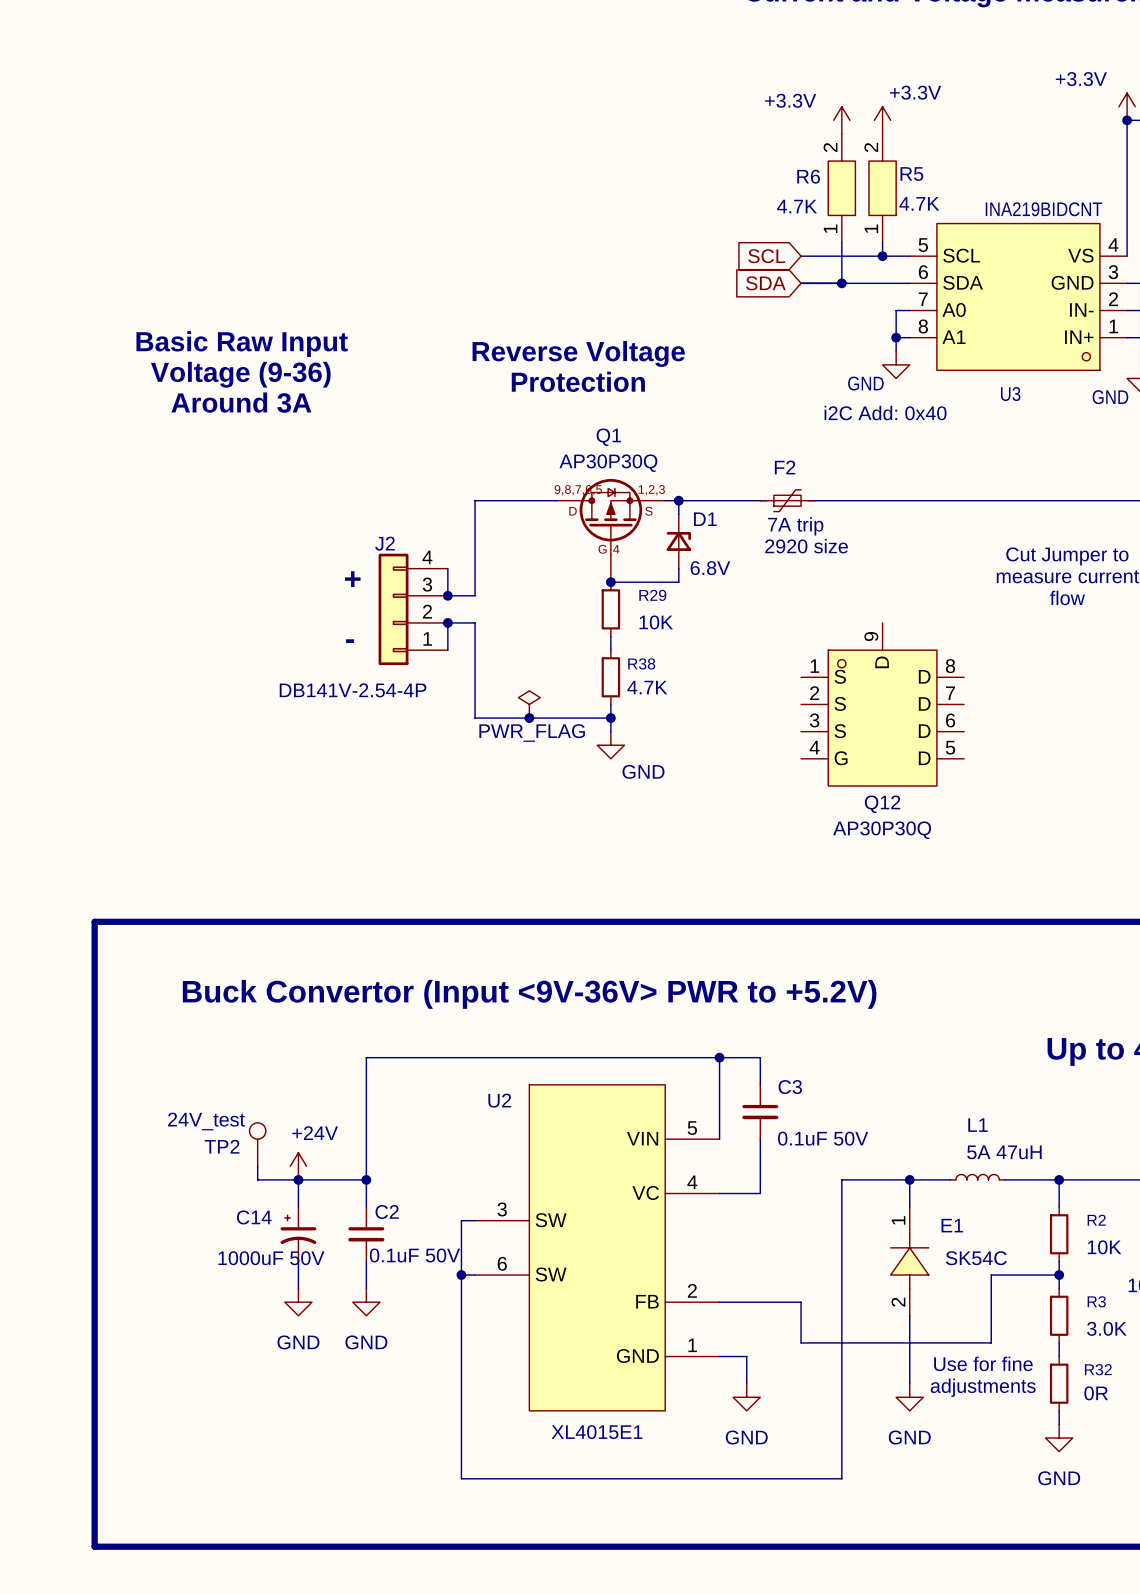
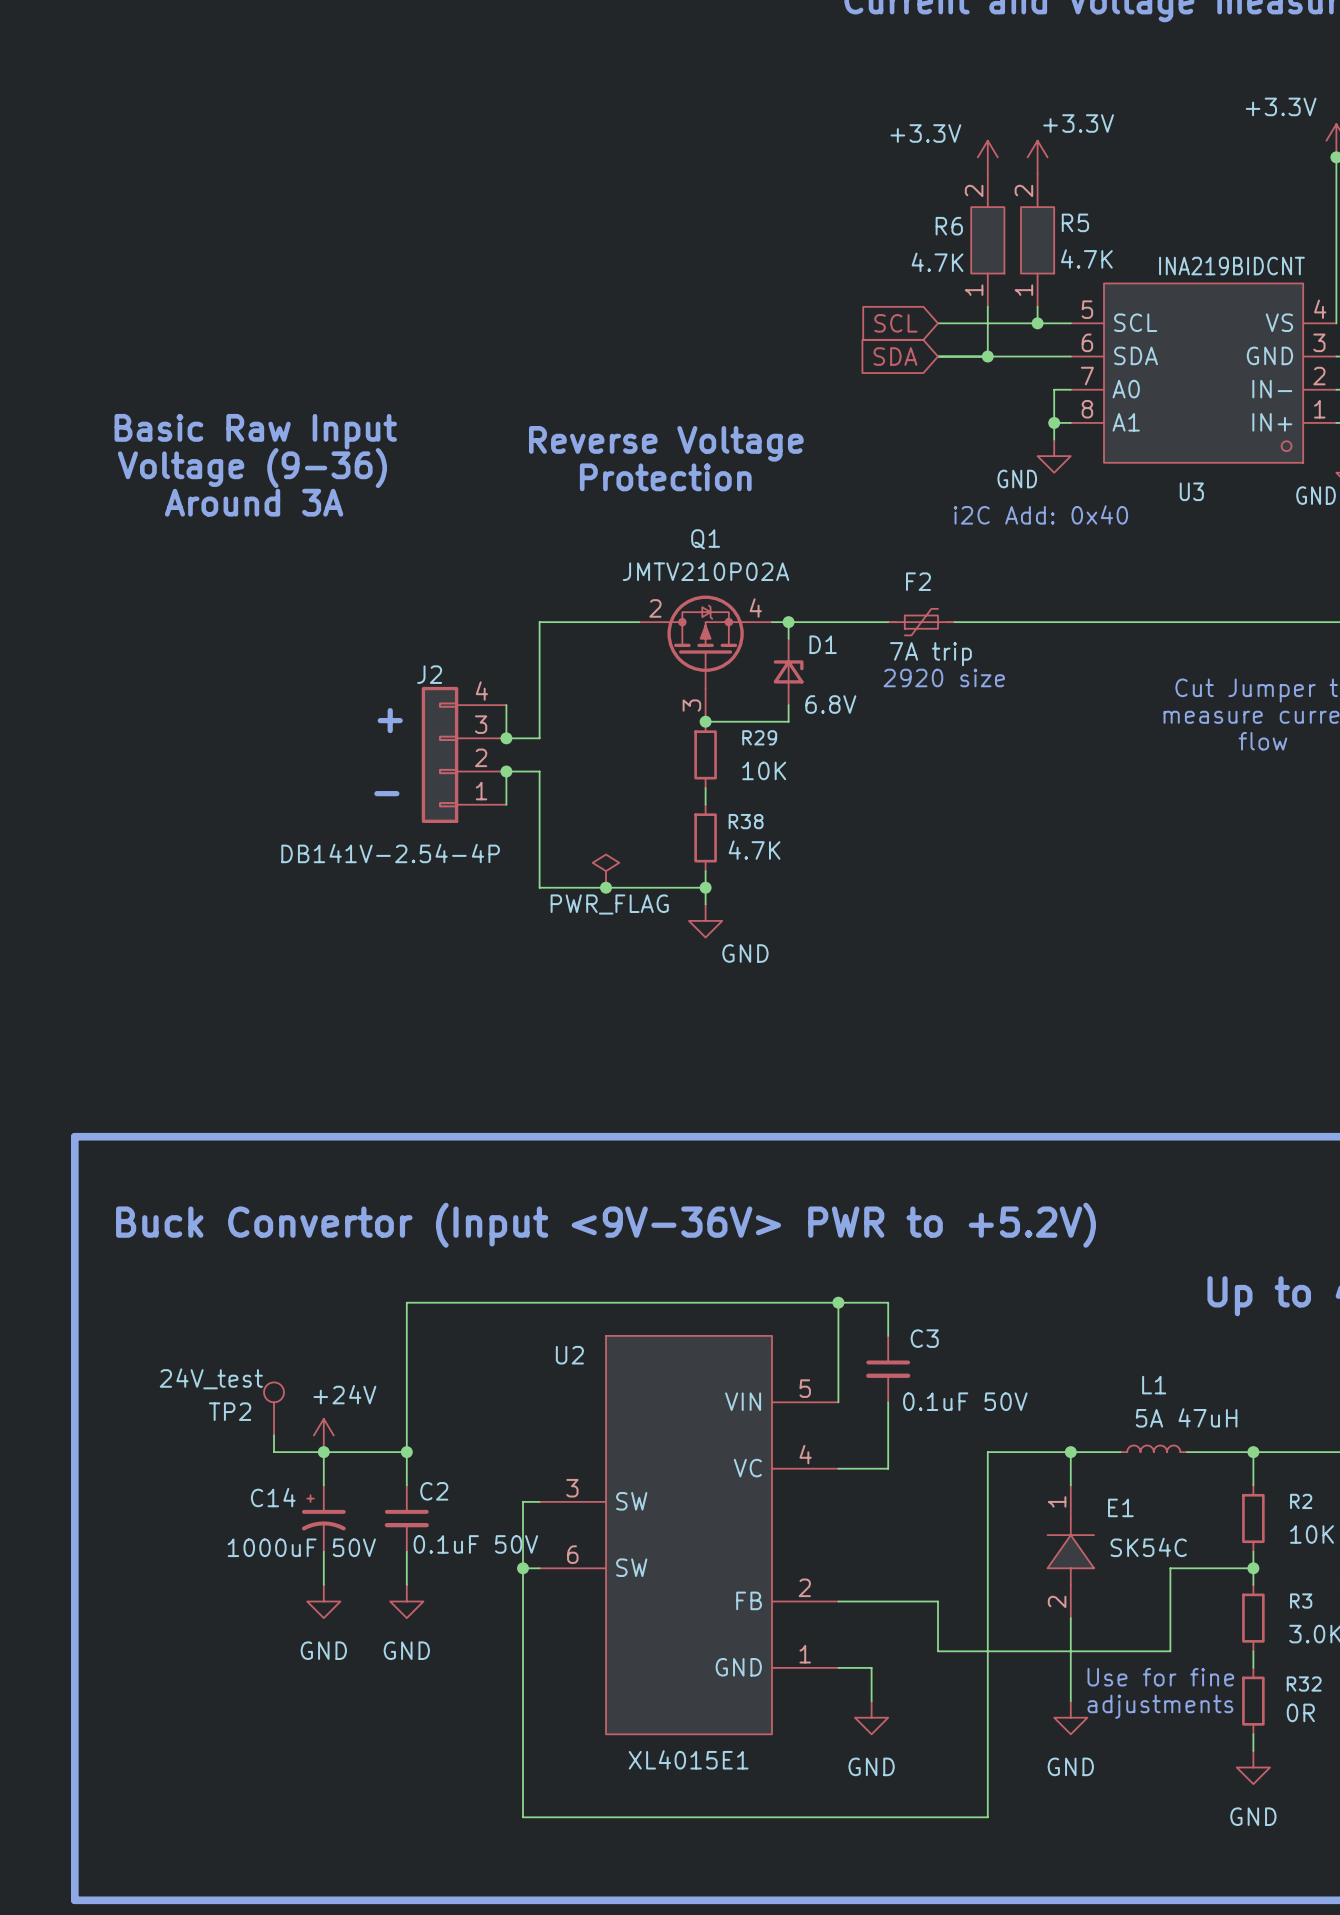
Q1 value: AP30P30Q (608, 463) -> JMTV210P02A (706, 571)
Q1 symbol: [556, 478, 666, 583] -> [639, 595, 773, 722]
Q12: AP30P30Q (882, 704) -> none

